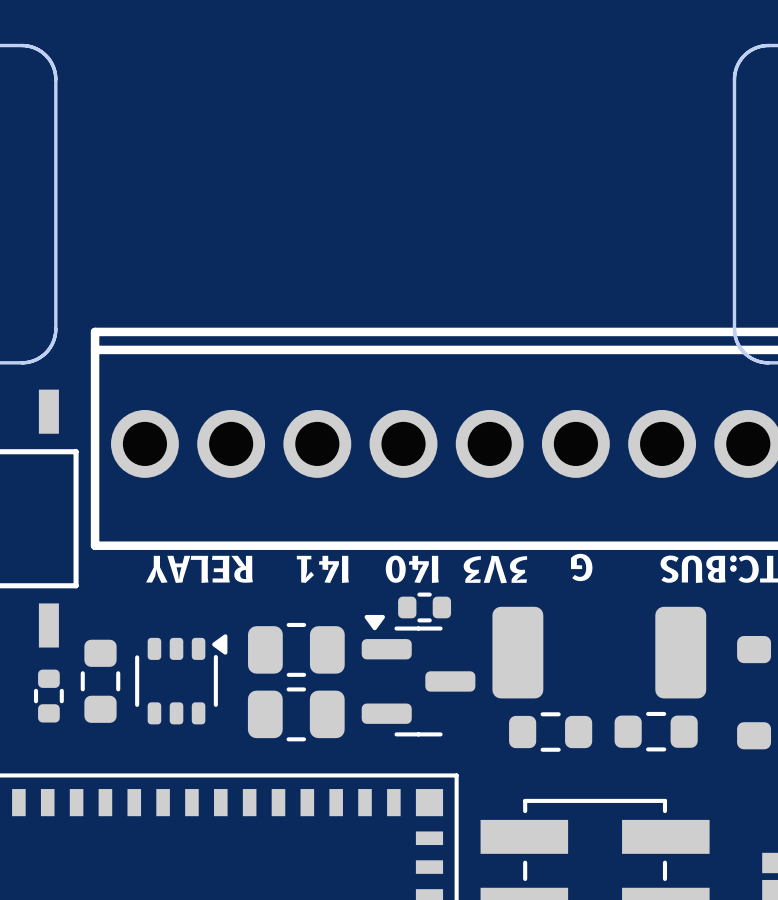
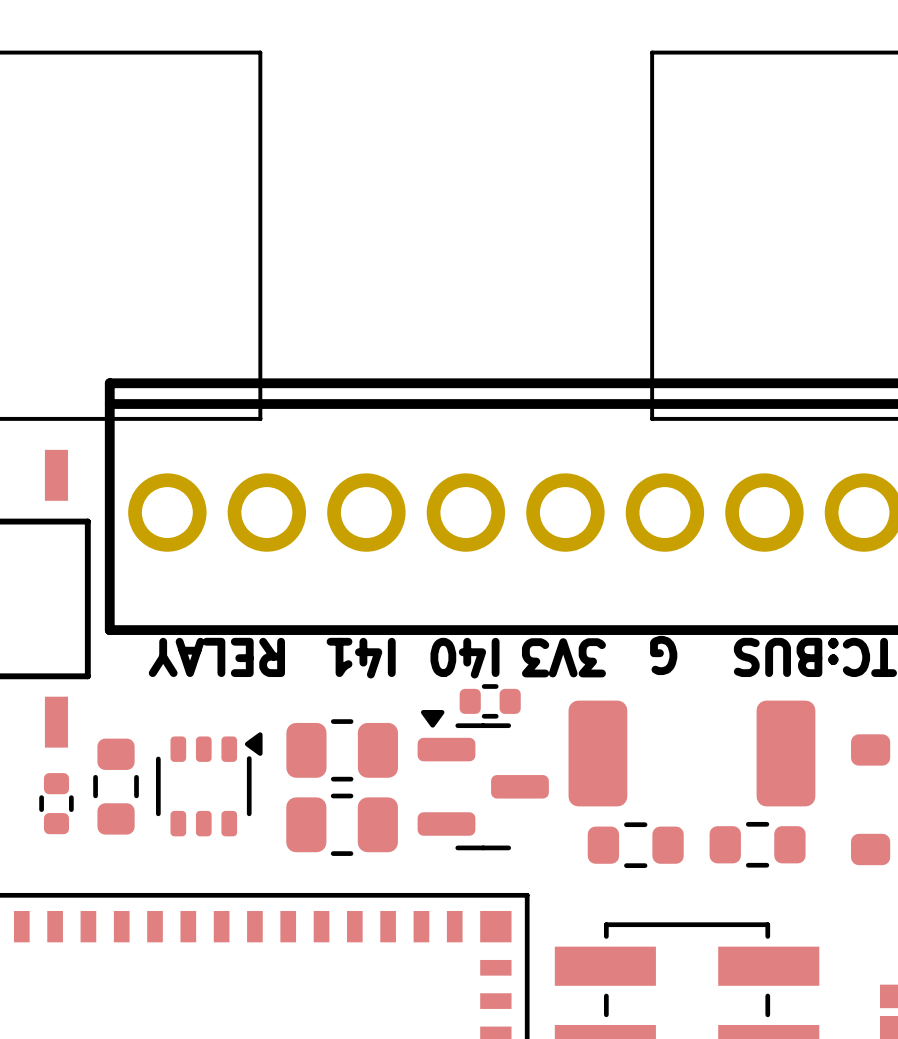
board edge: (21, 45) (34, 48) (45, 55) (53, 66) (55, 79) (55, 332) (51, 344) (44, 354) (33, 360) (21, 362) -> (25, 52) (260, 52) (260, 418) (25, 418)
board edge: (768, 45) (755, 48) (744, 55) (737, 66) (734, 79) (734, 332) (738, 344) (745, 354) (756, 360) (768, 362) -> (887, 52) (652, 52) (652, 418) (887, 418)

